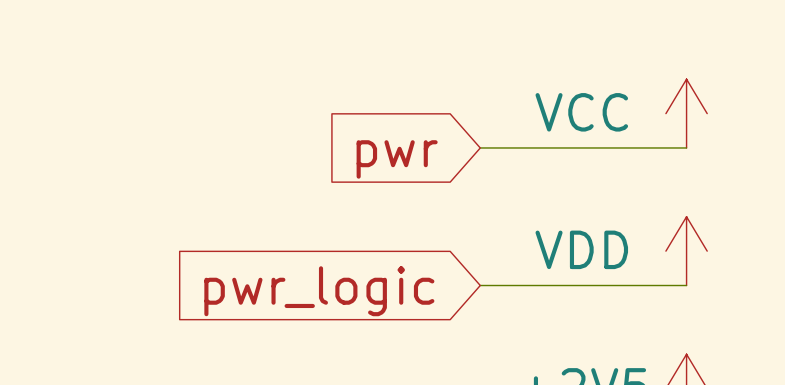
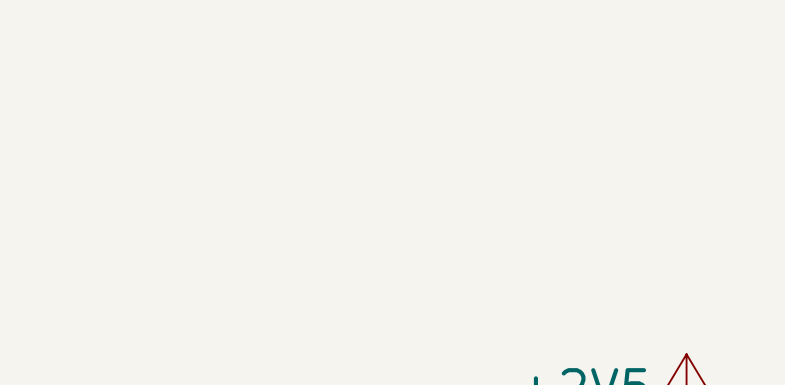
power symbol: VCC (686, 113) -> none
wire: (480, 147) (686, 147) -> none
global label: pwr (397, 159) -> none
power symbol: VDD (686, 251) -> none
wire: (480, 285) (686, 285) -> none
global label: pwr_logic (319, 291) -> none

